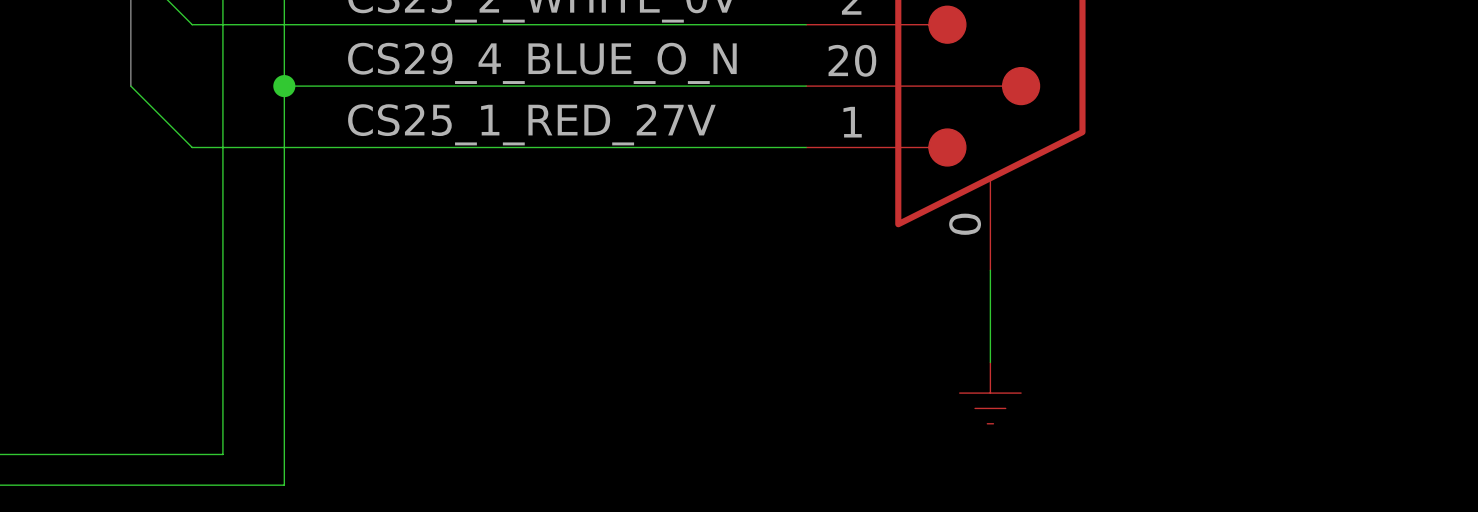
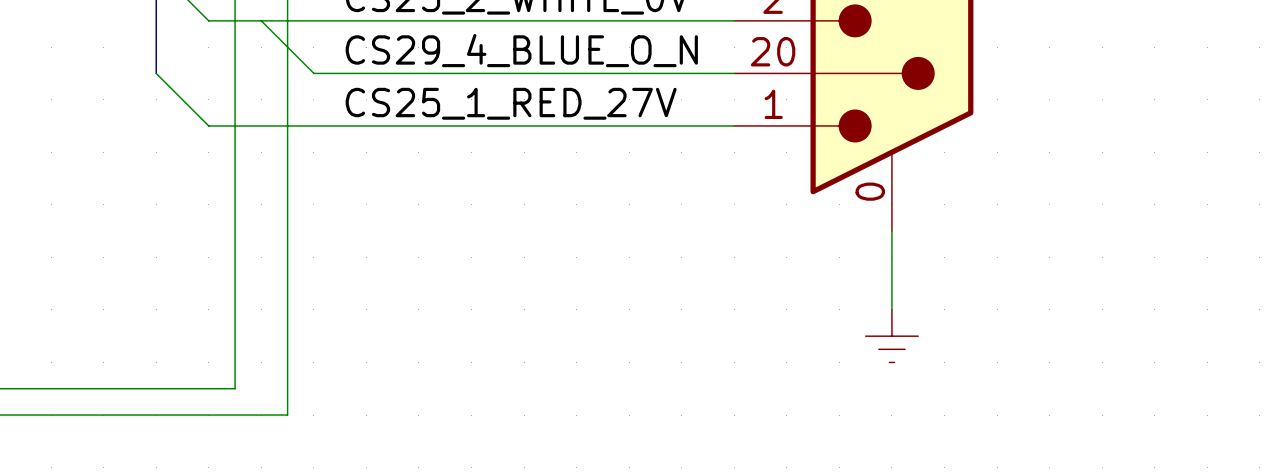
wire: (284, 86) (315, 86) -> (261, 20) (313, 73)
junction: (284, 86) -> none

